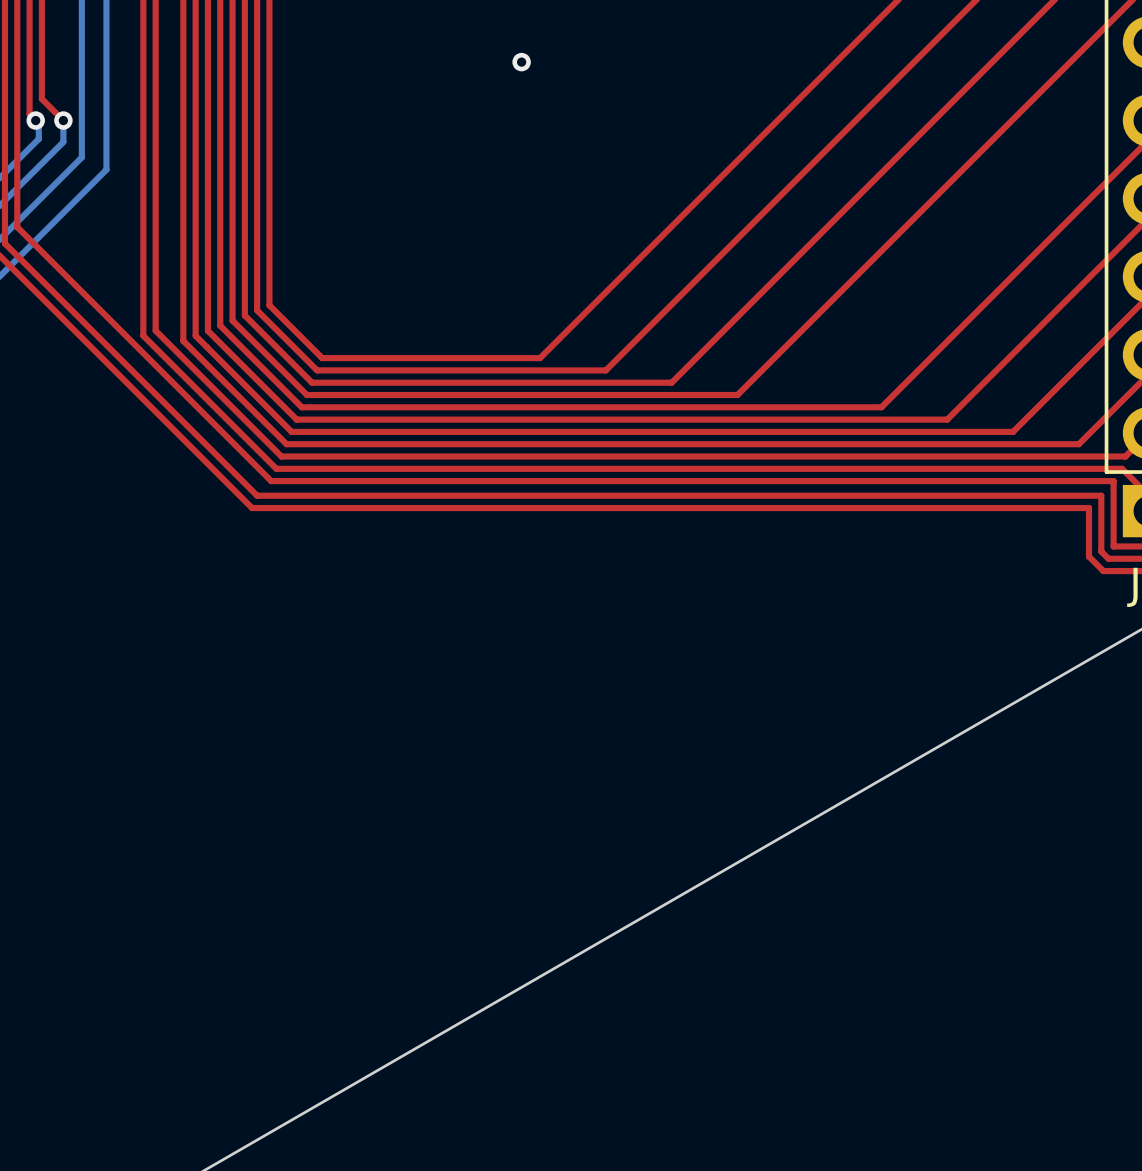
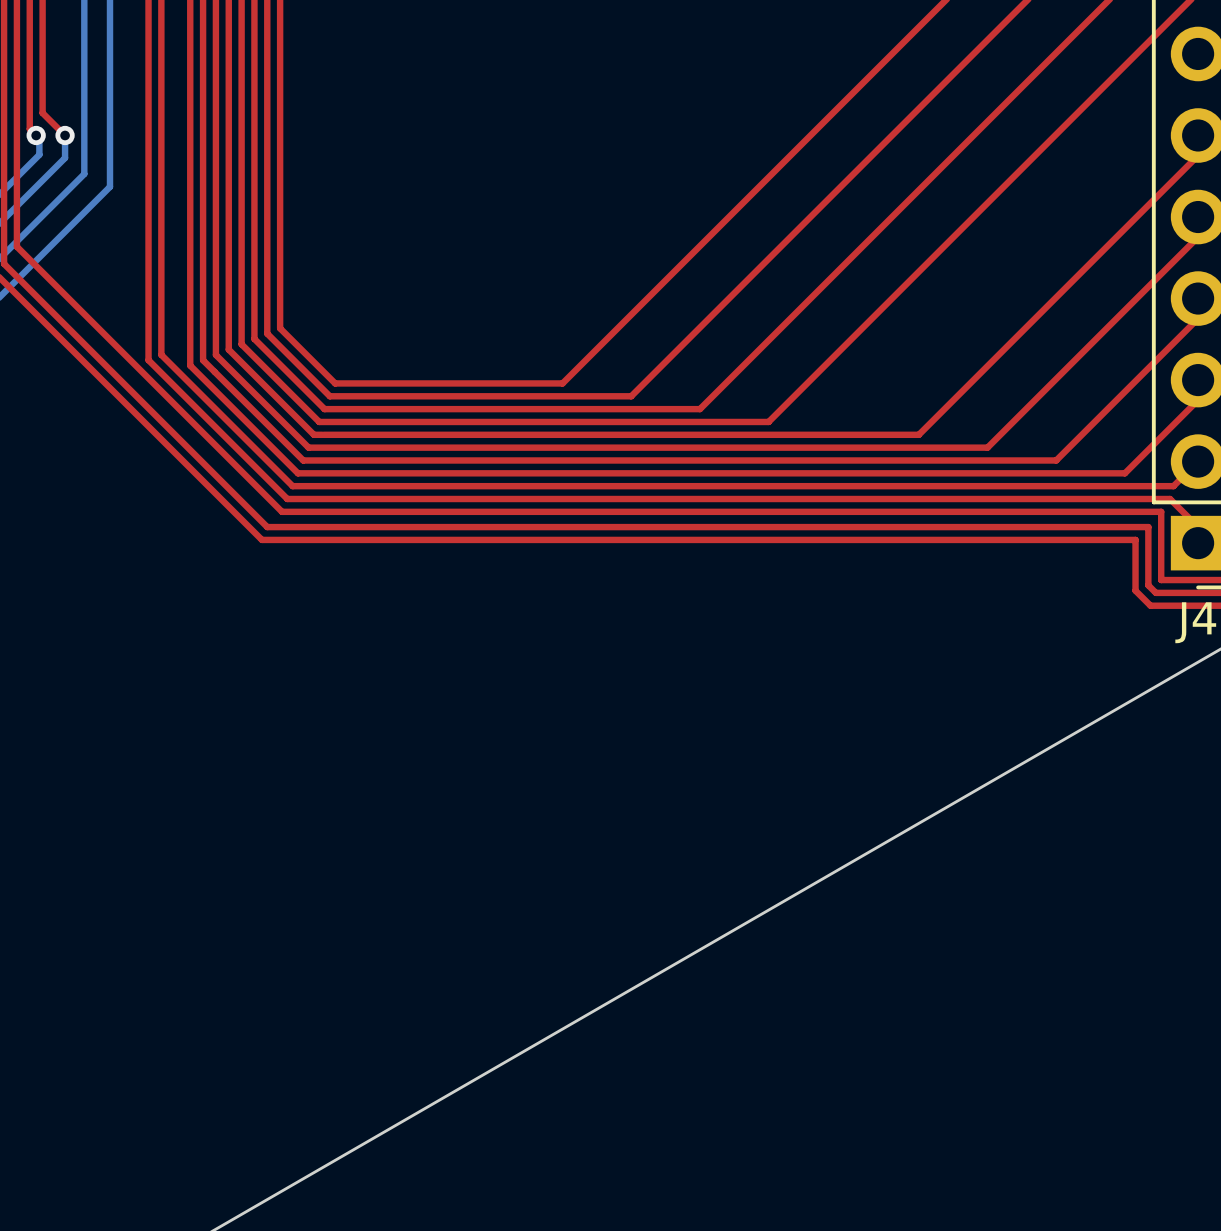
via: (521, 62) -> none

